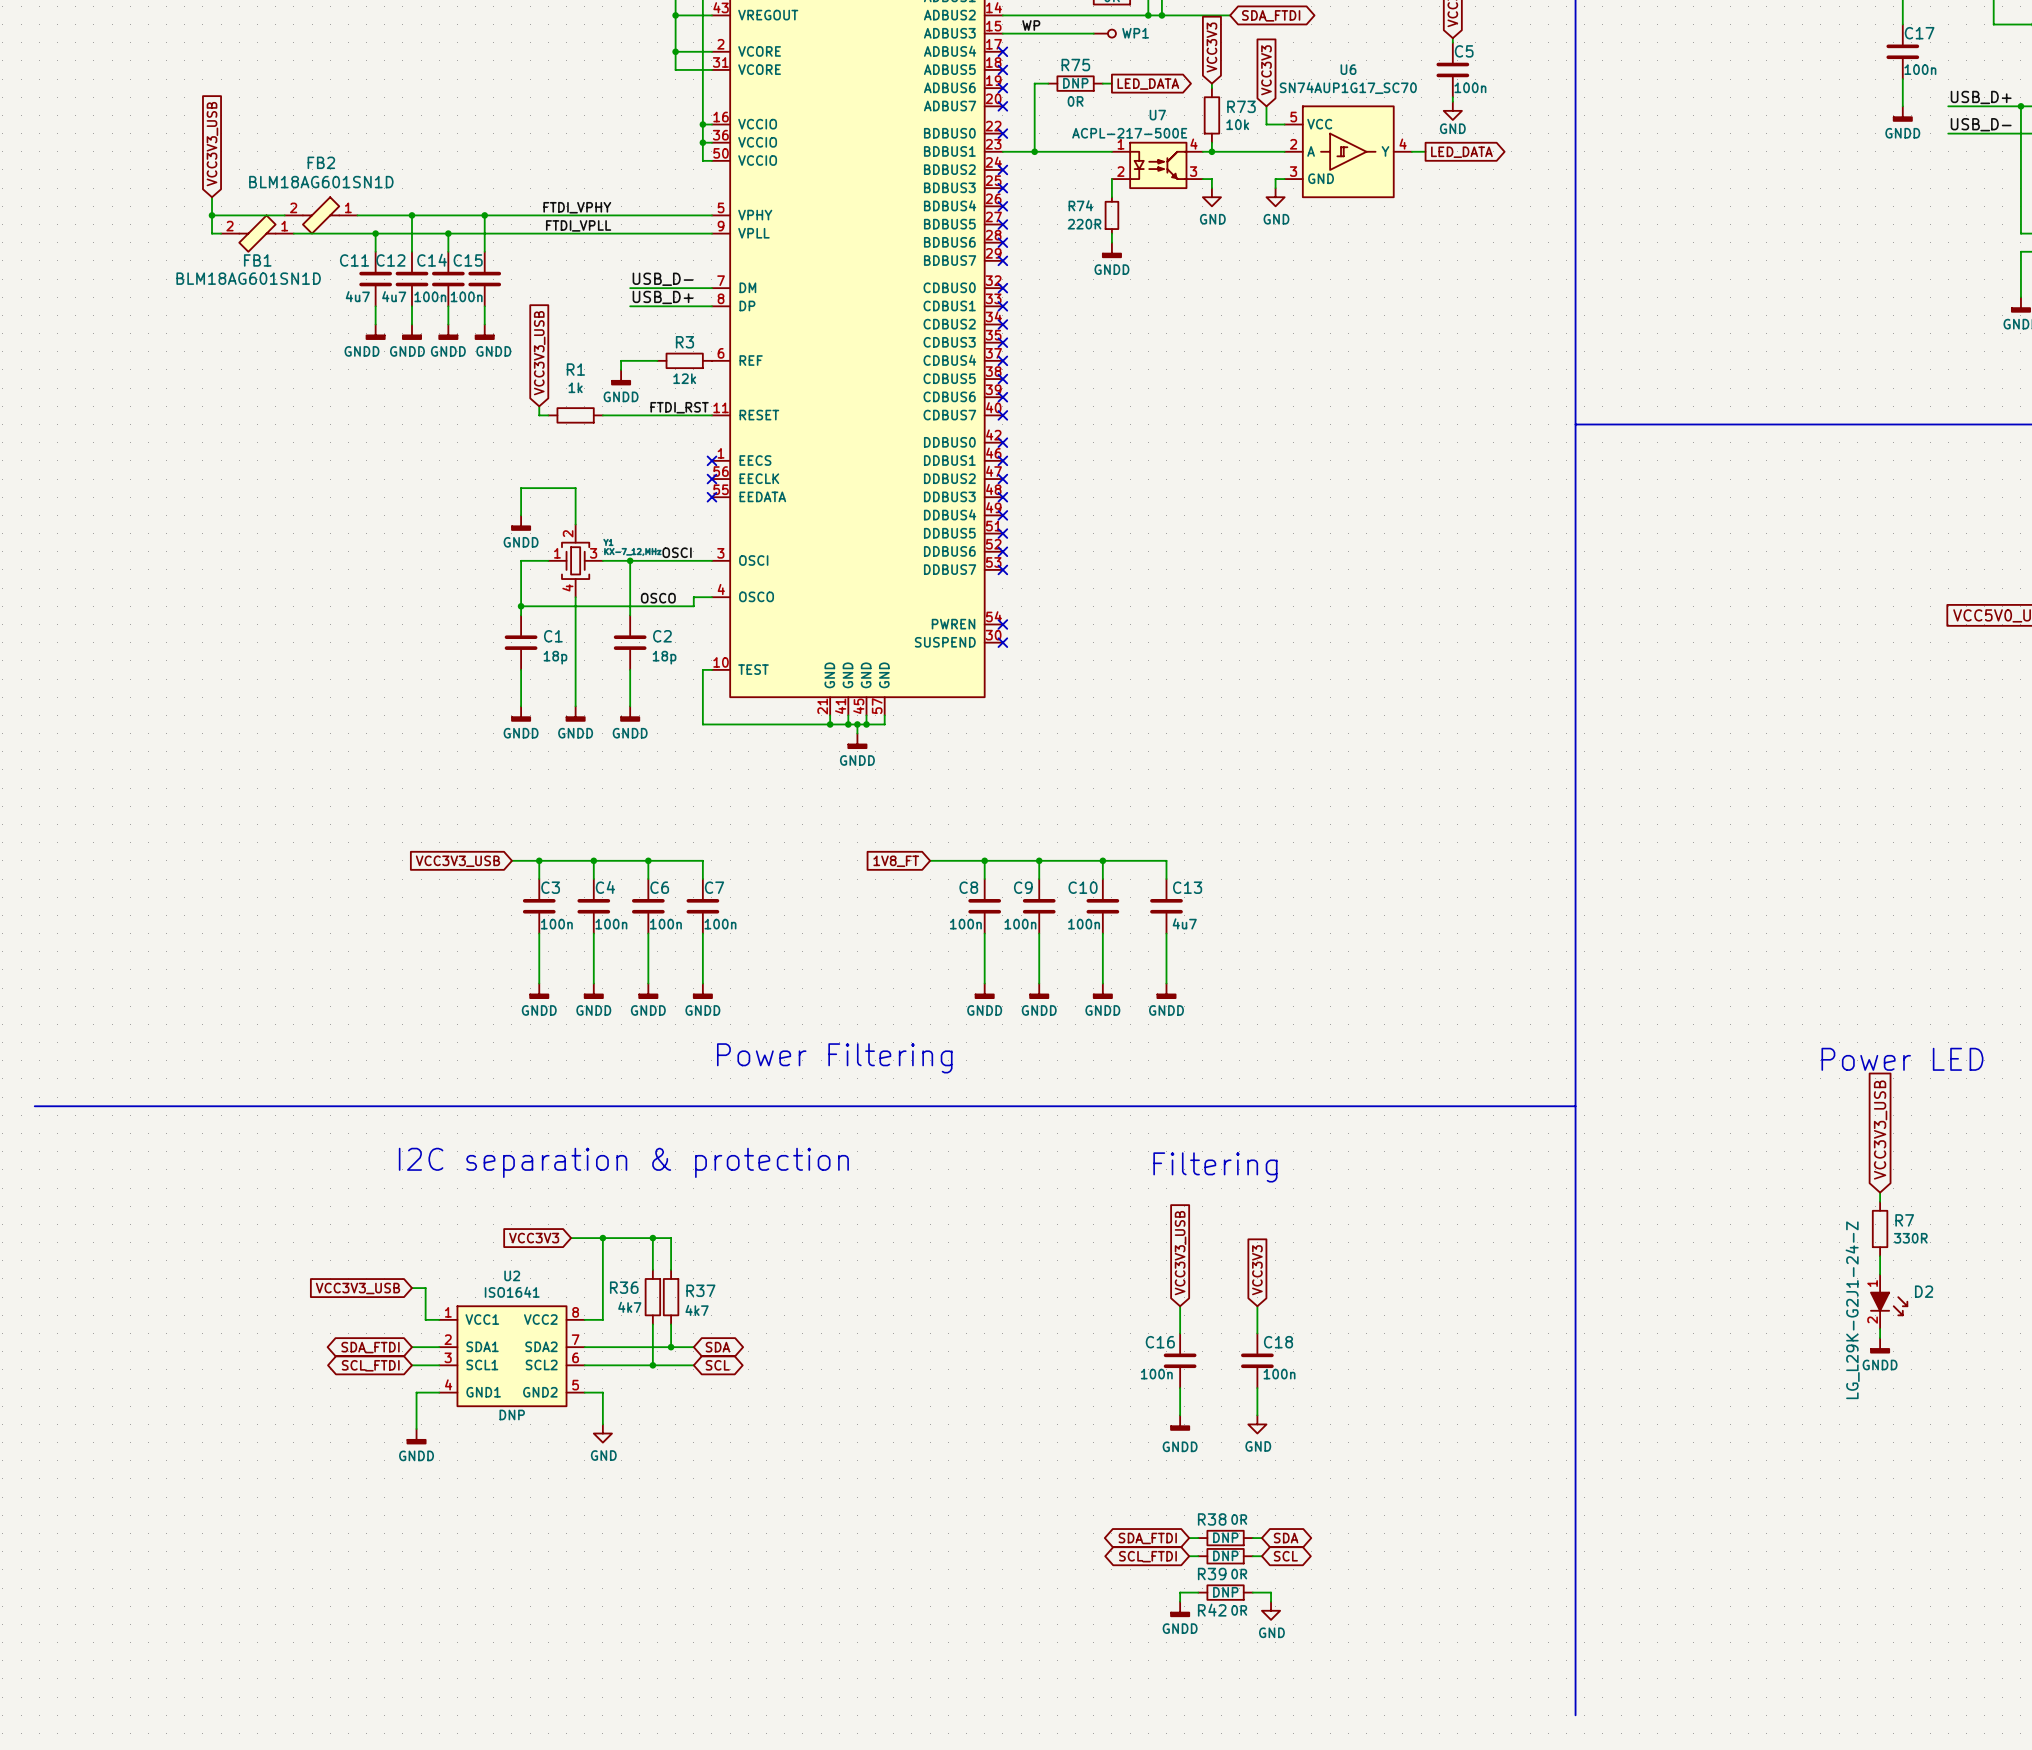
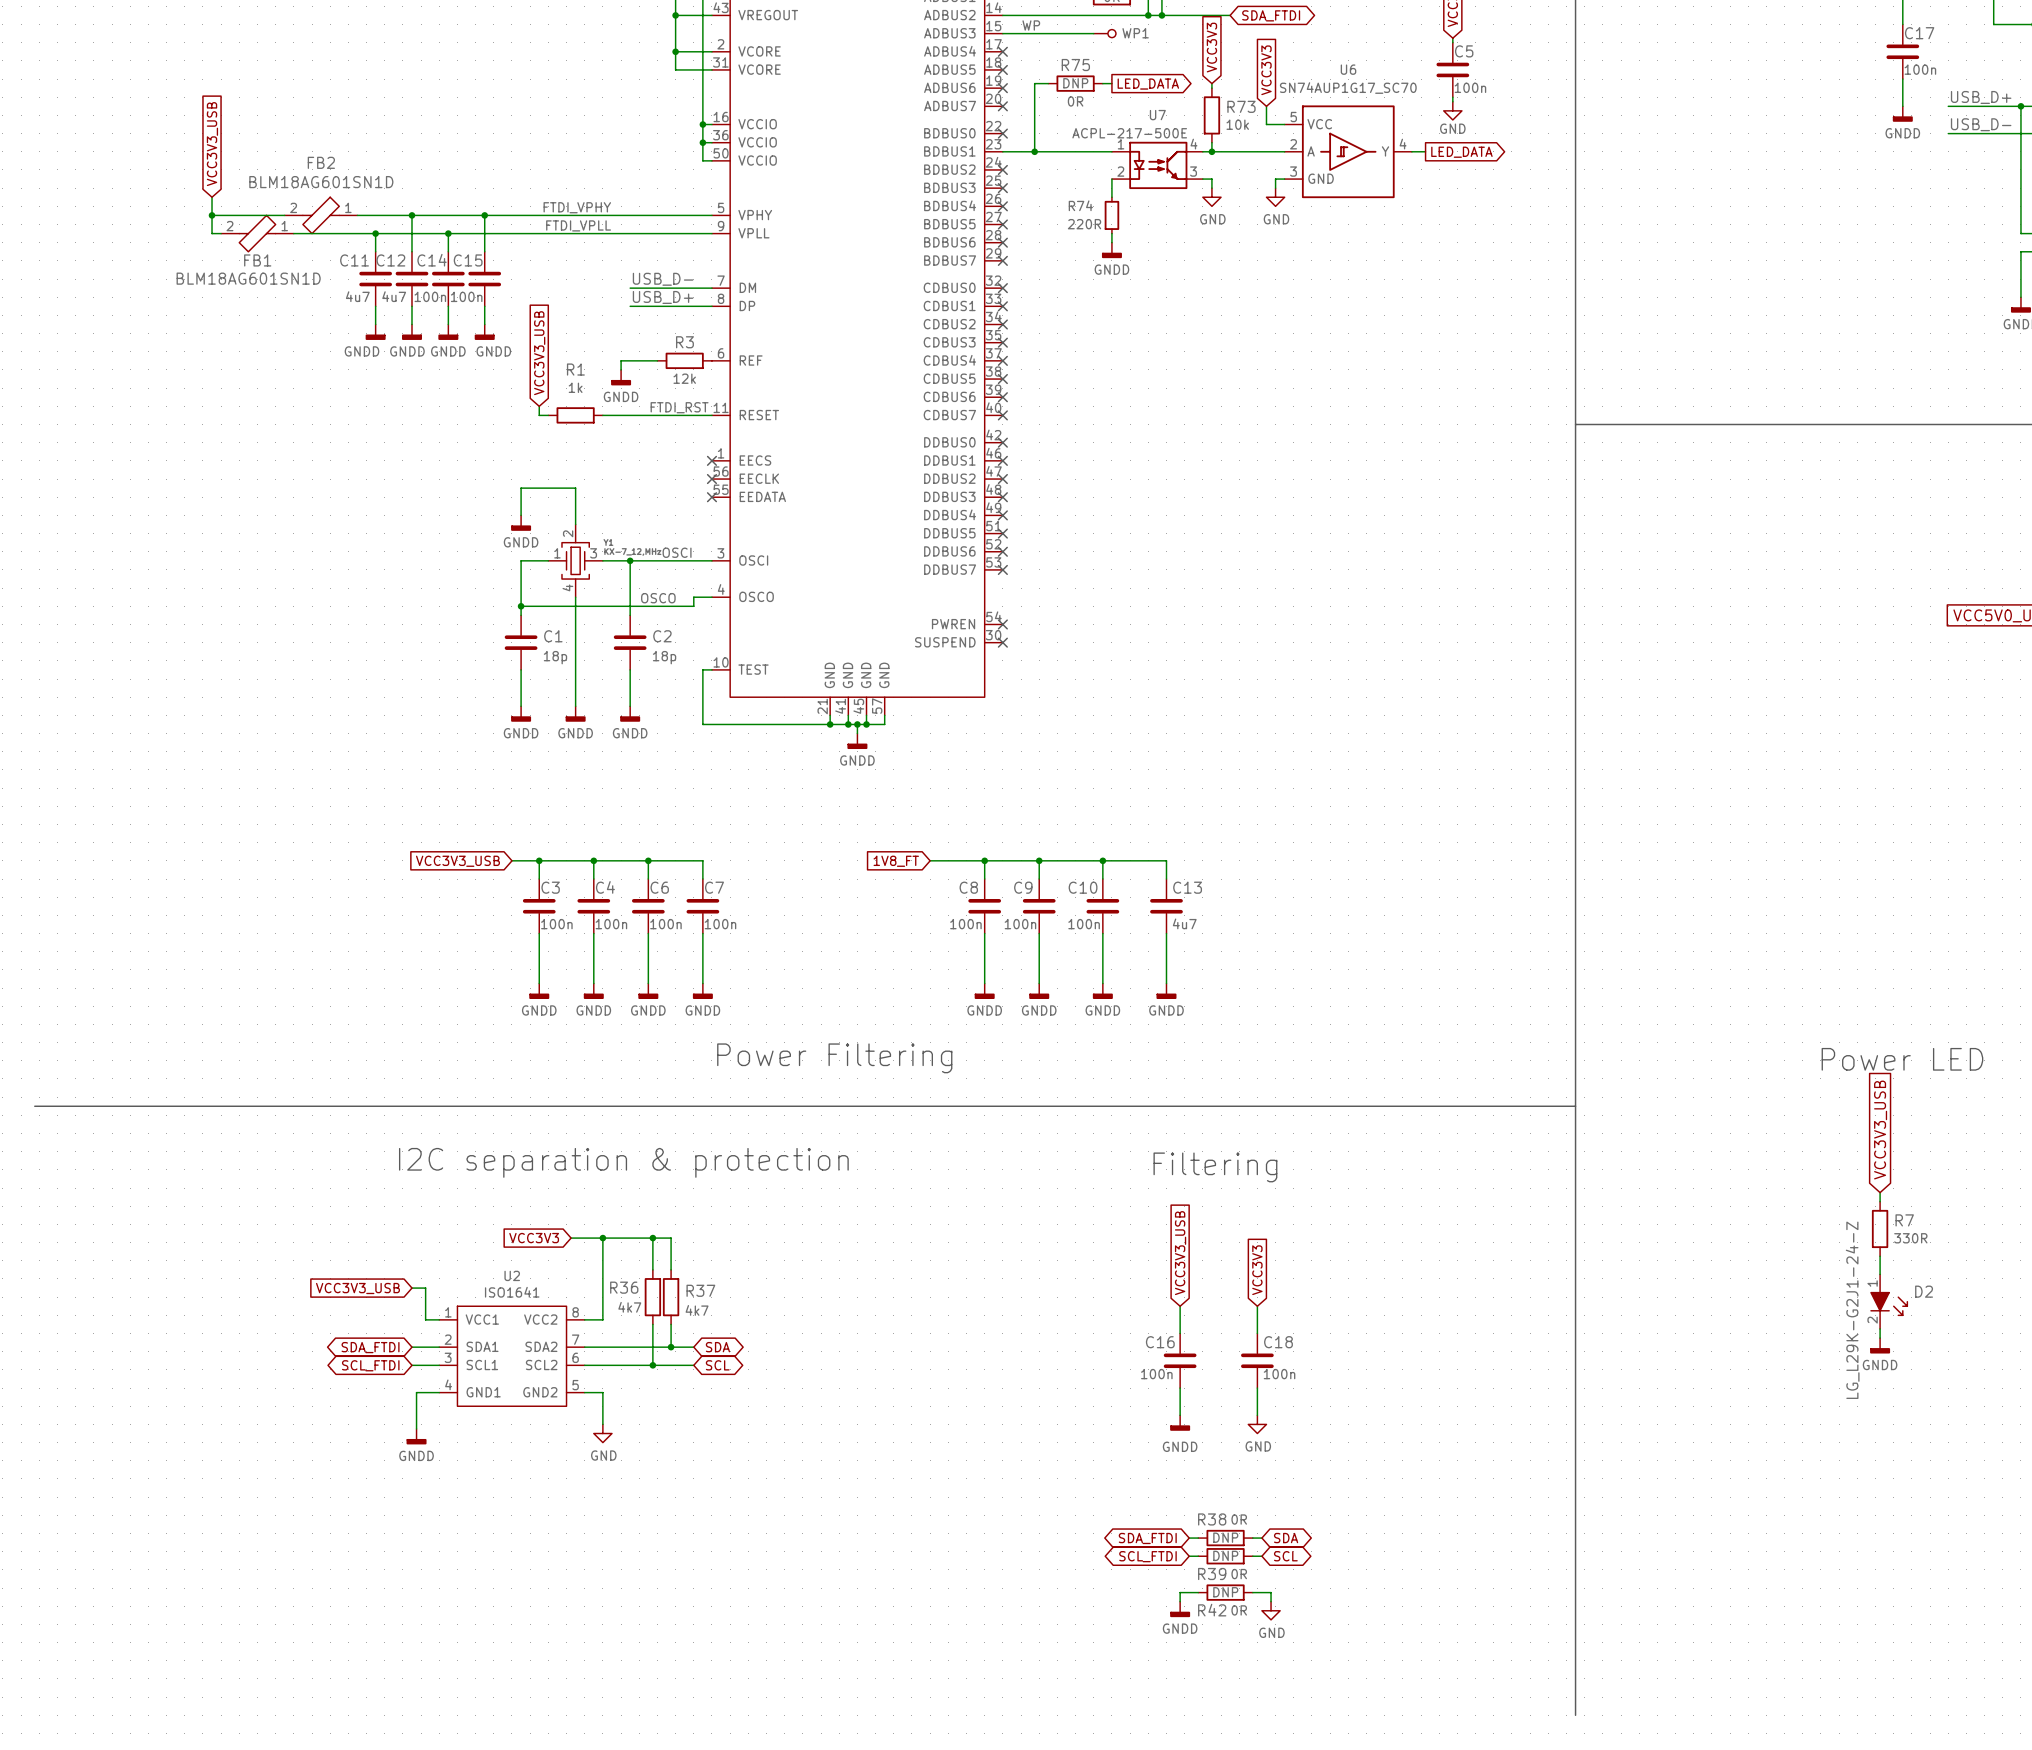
U2 text: DNP (512, 1414) -> none

